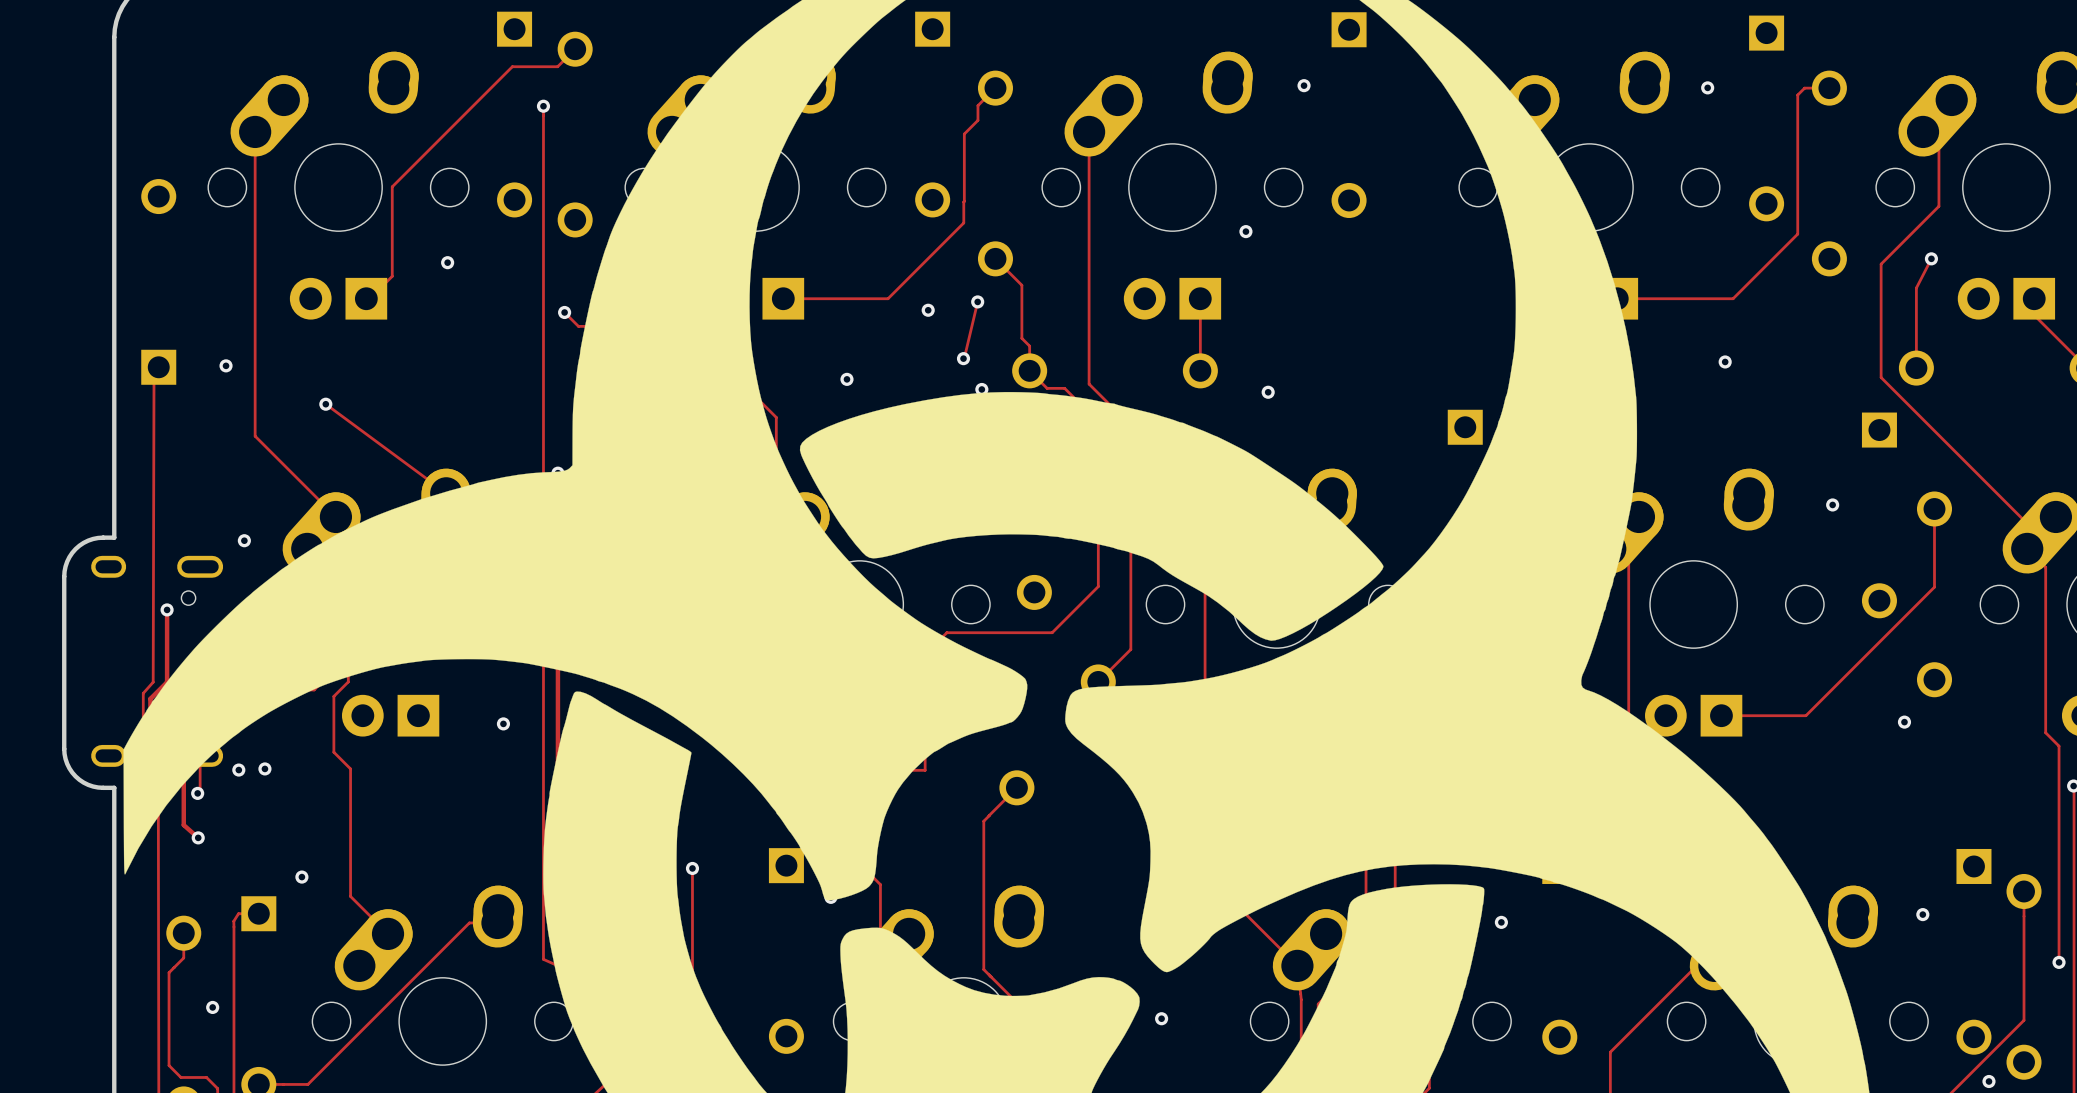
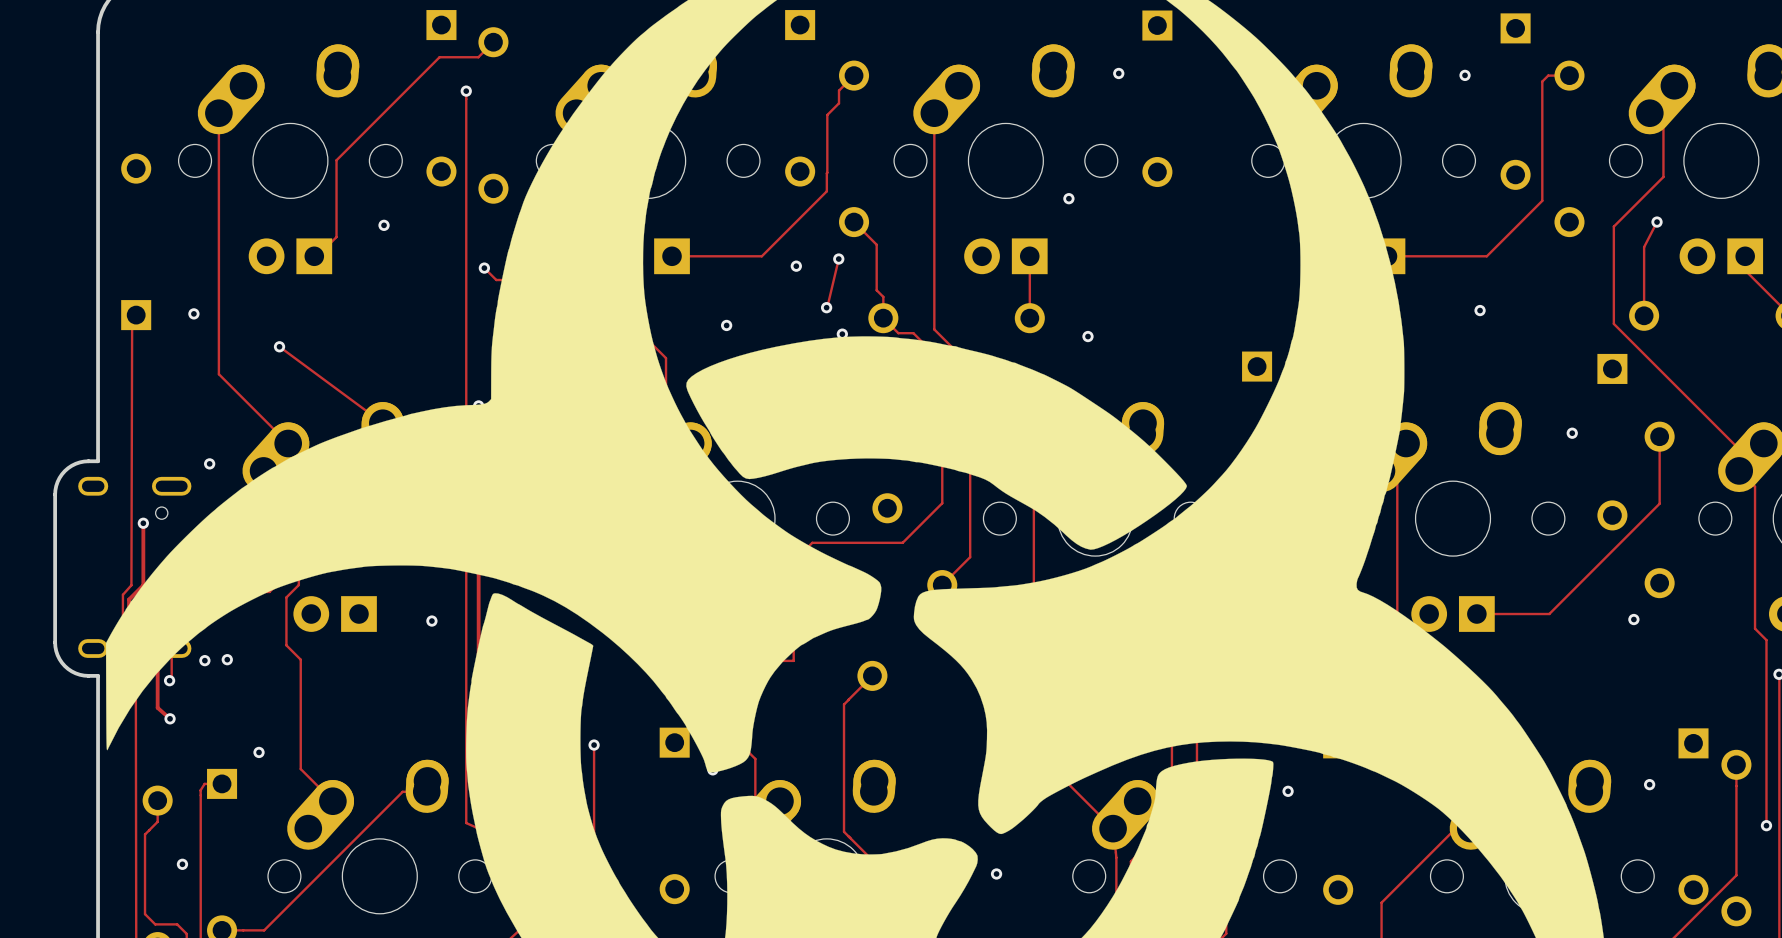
via: (1988, 1081) -> none

